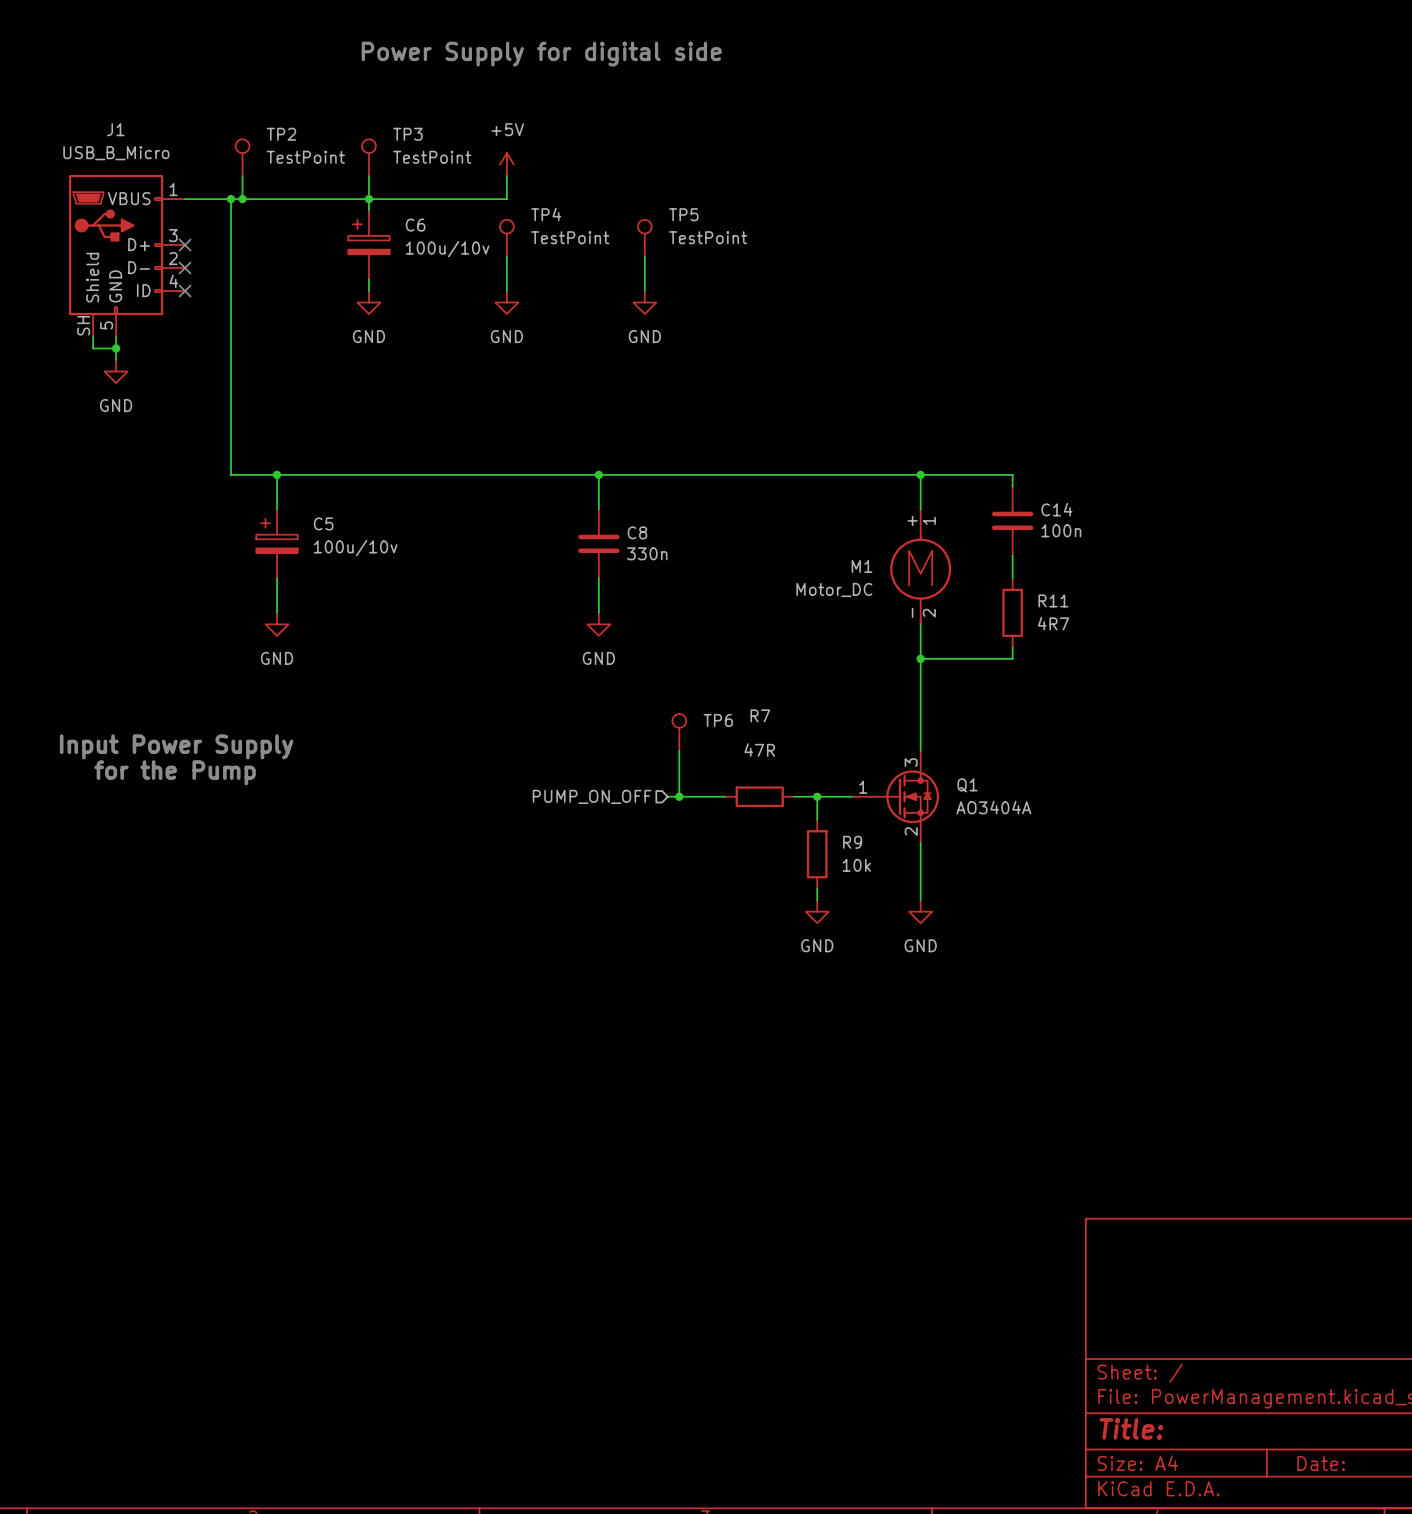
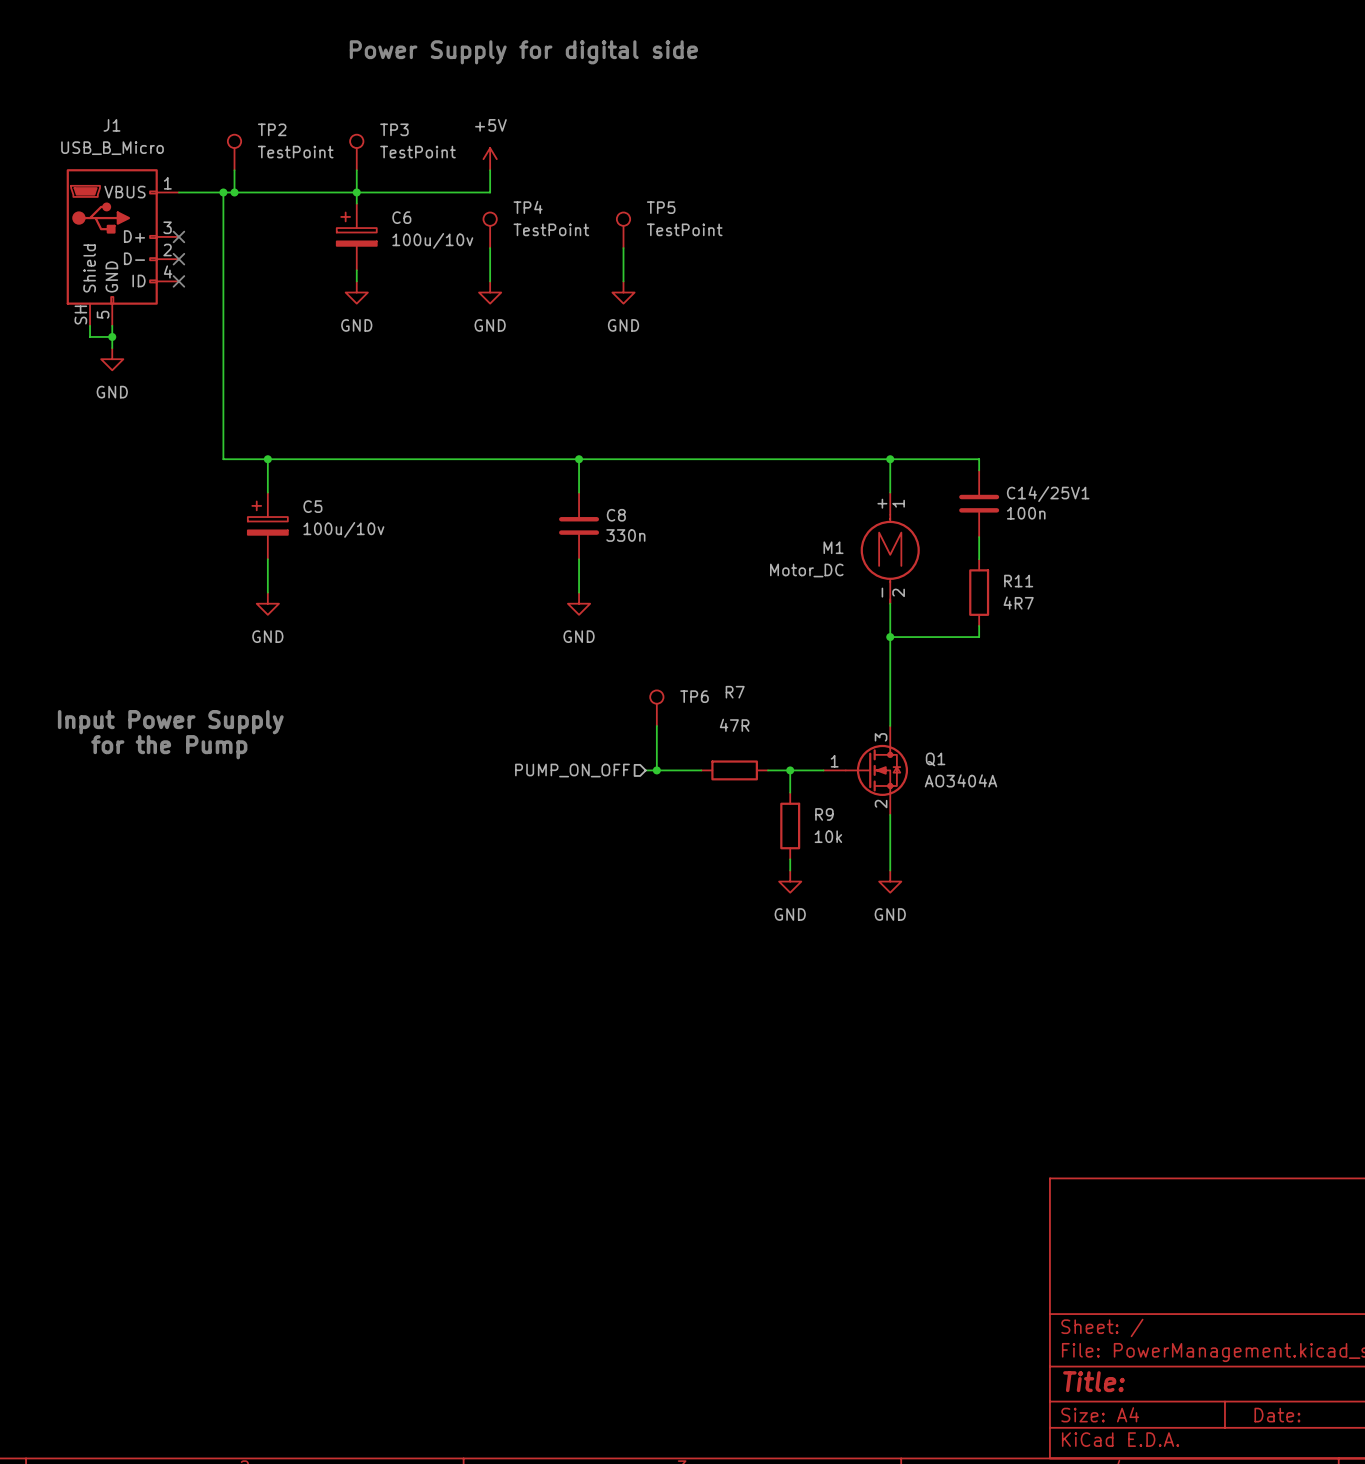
C14 name: C14 (1056, 509) -> C14/25V1 (1048, 494)

